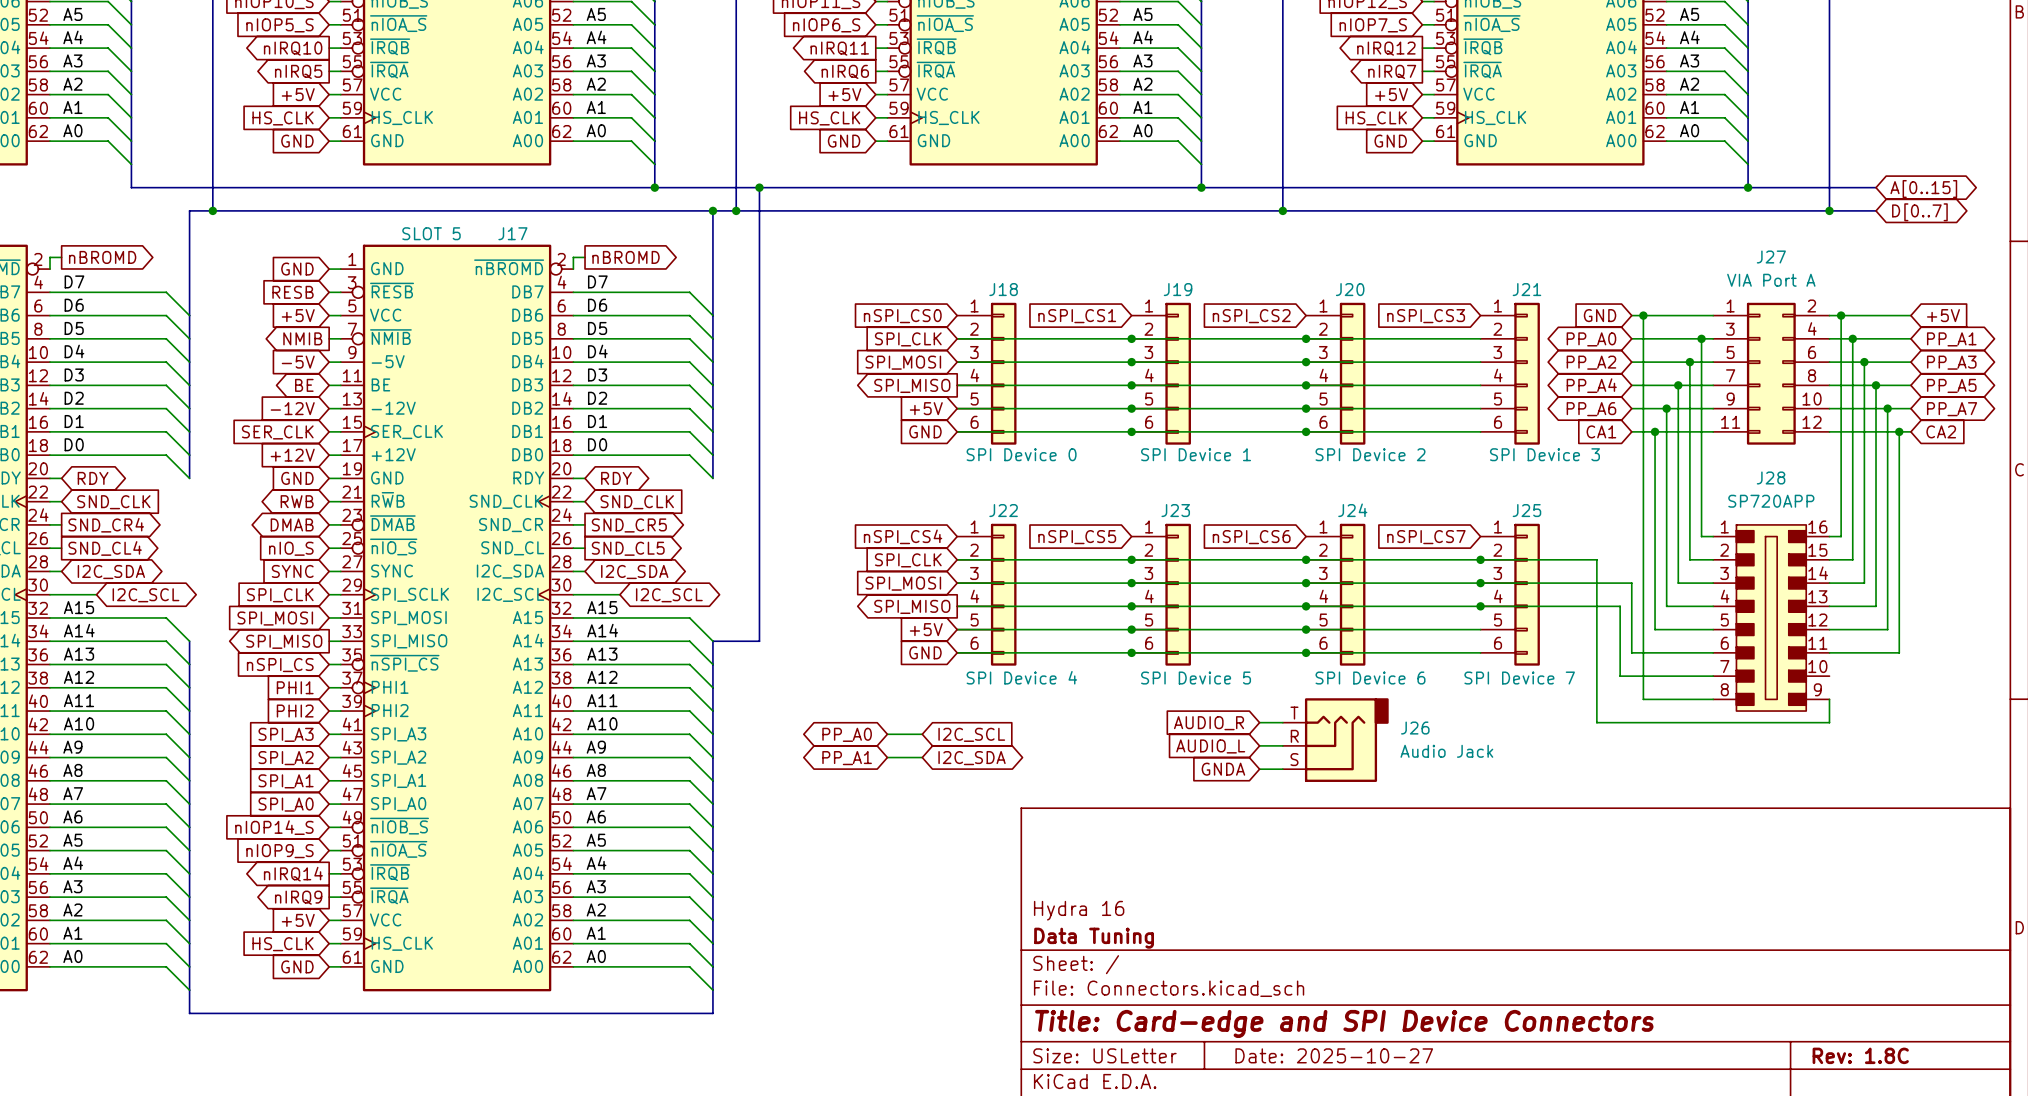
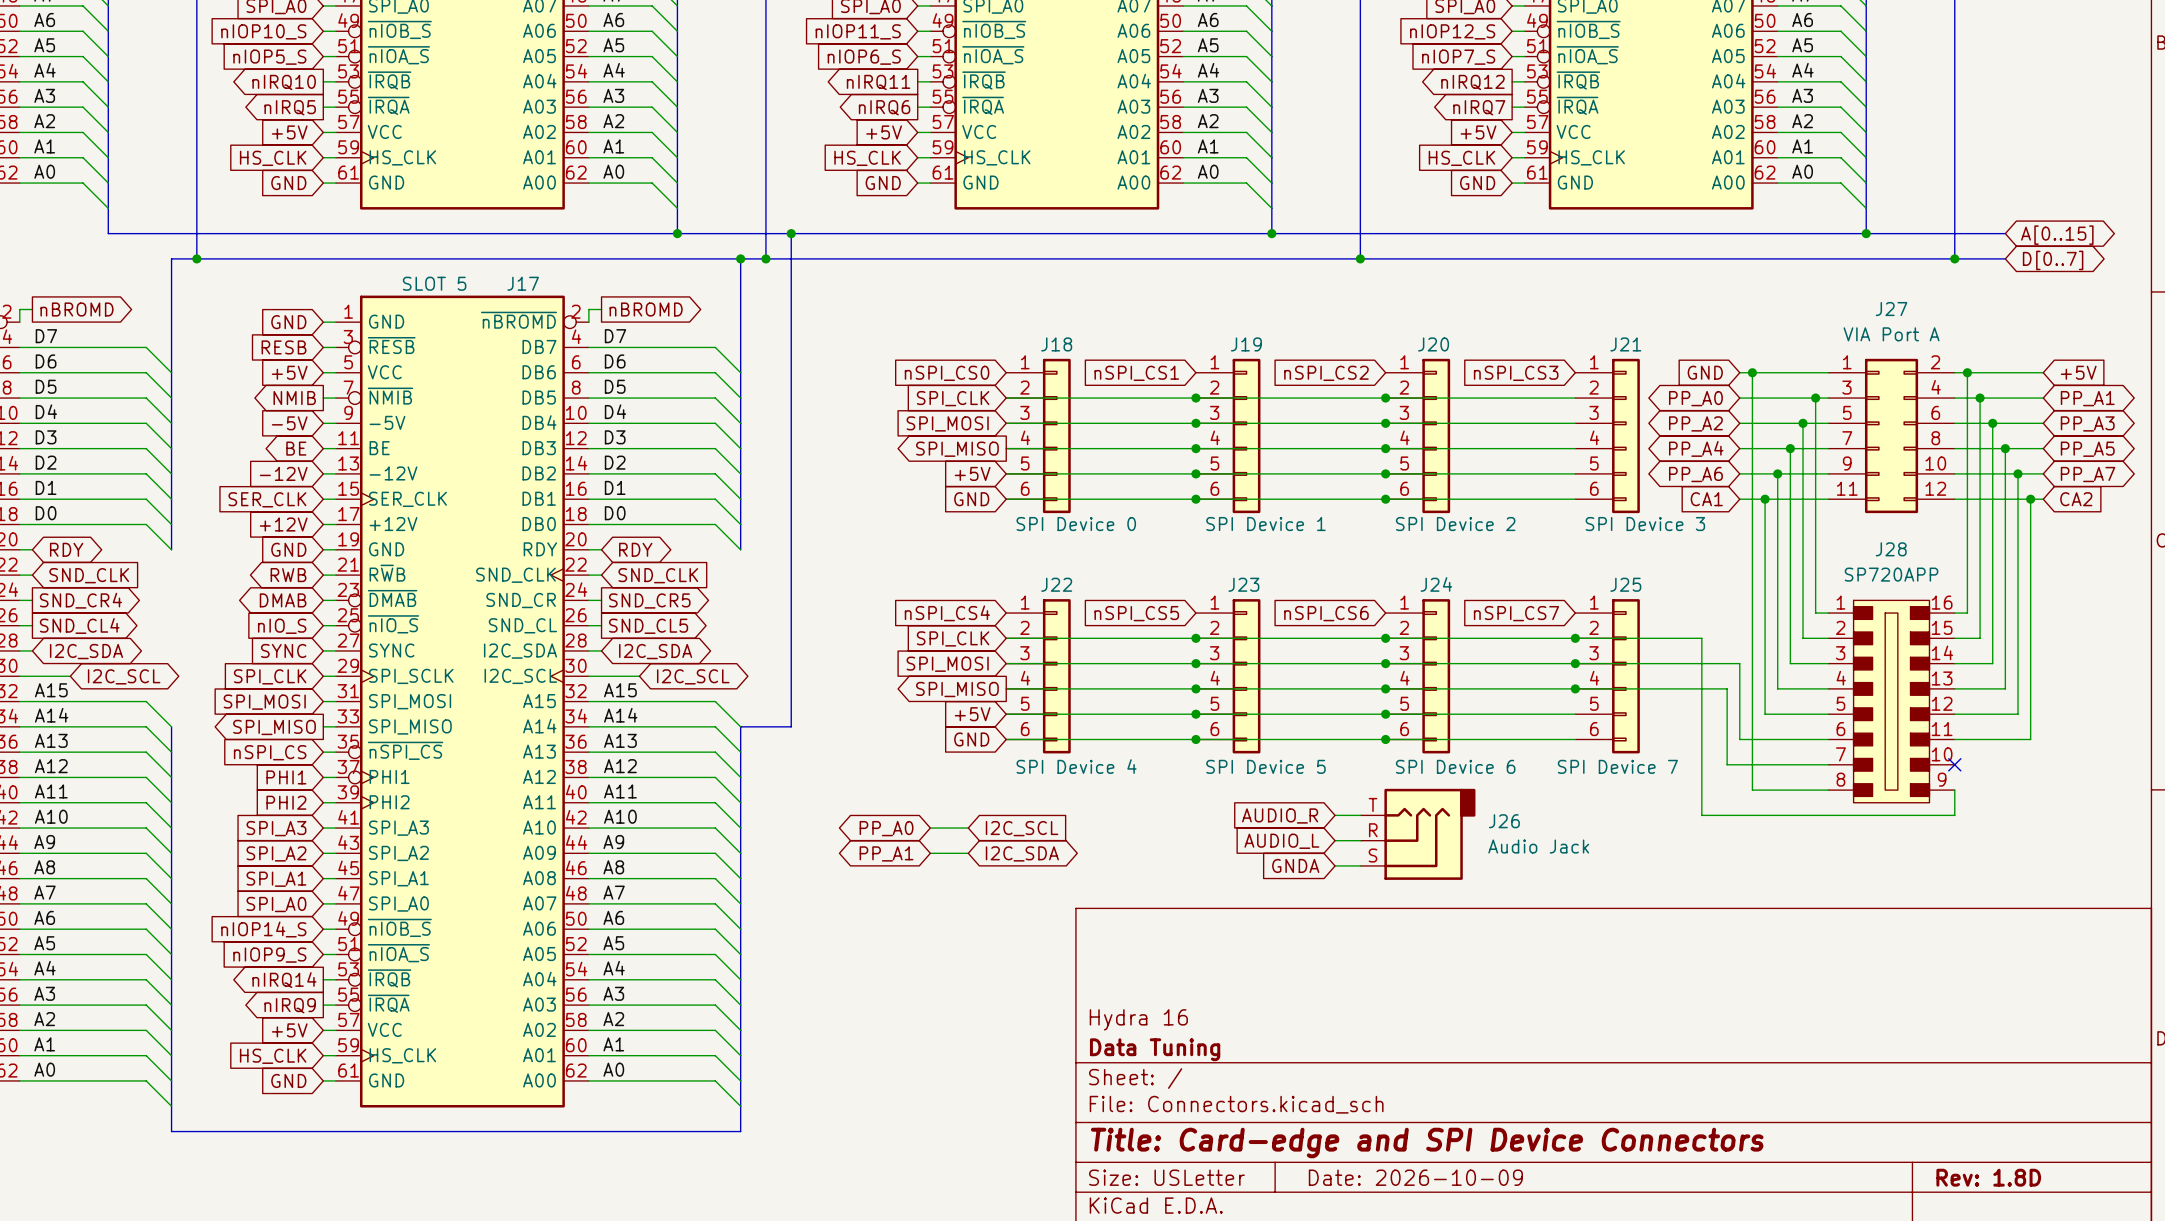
no-connect mark: none -> (1954, 764)
title block: Date: 2025-10-27 (1334, 1055) -> Date: 2026-10-09 (1415, 1177)
title block: Rev: 1.8C (1860, 1055) -> Rev: 1.8D (1988, 1177)

